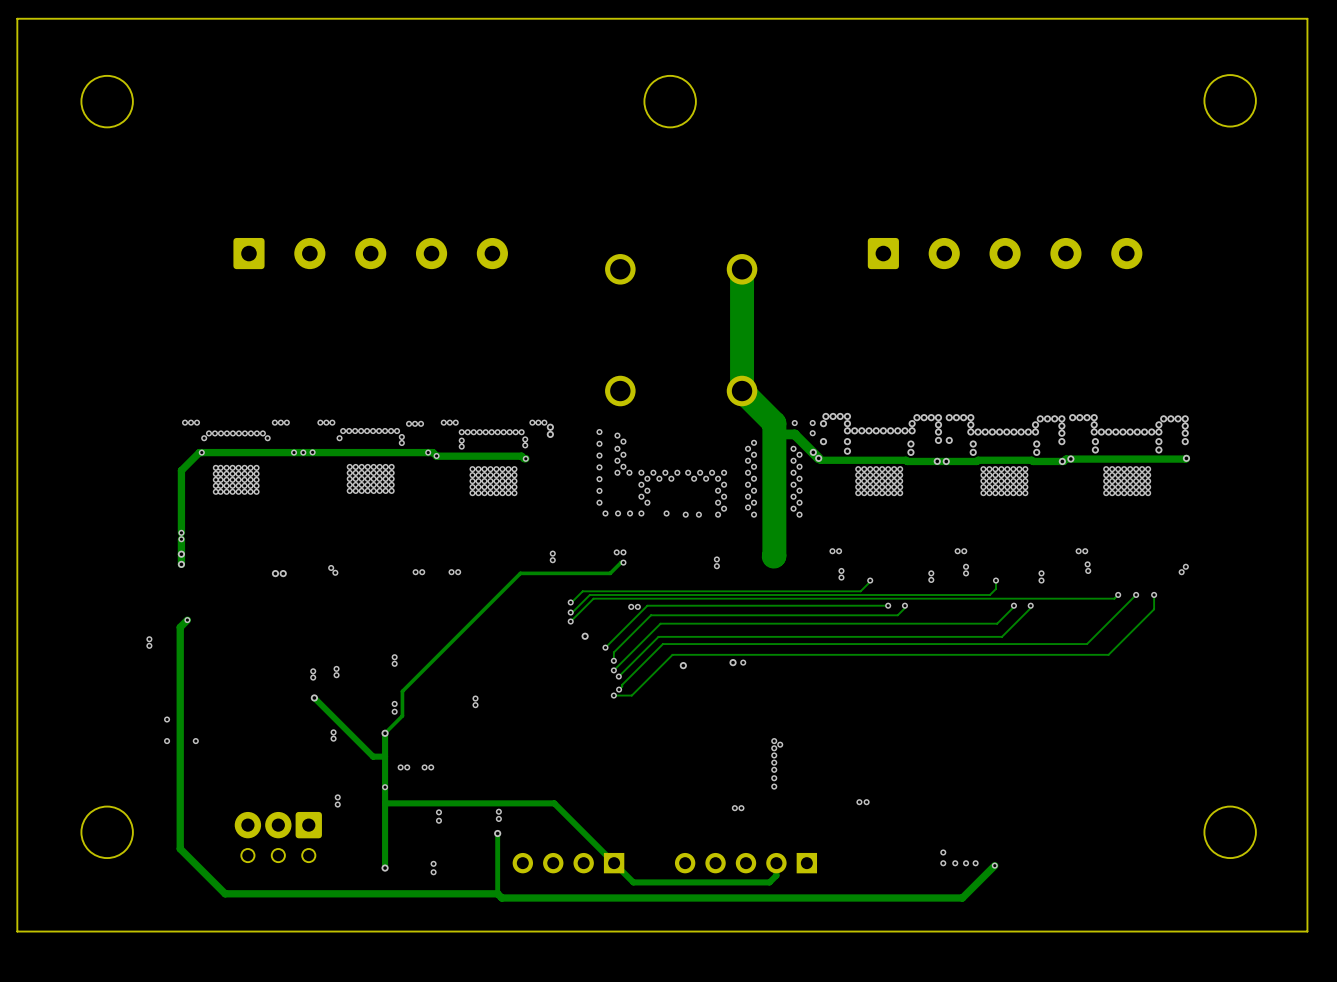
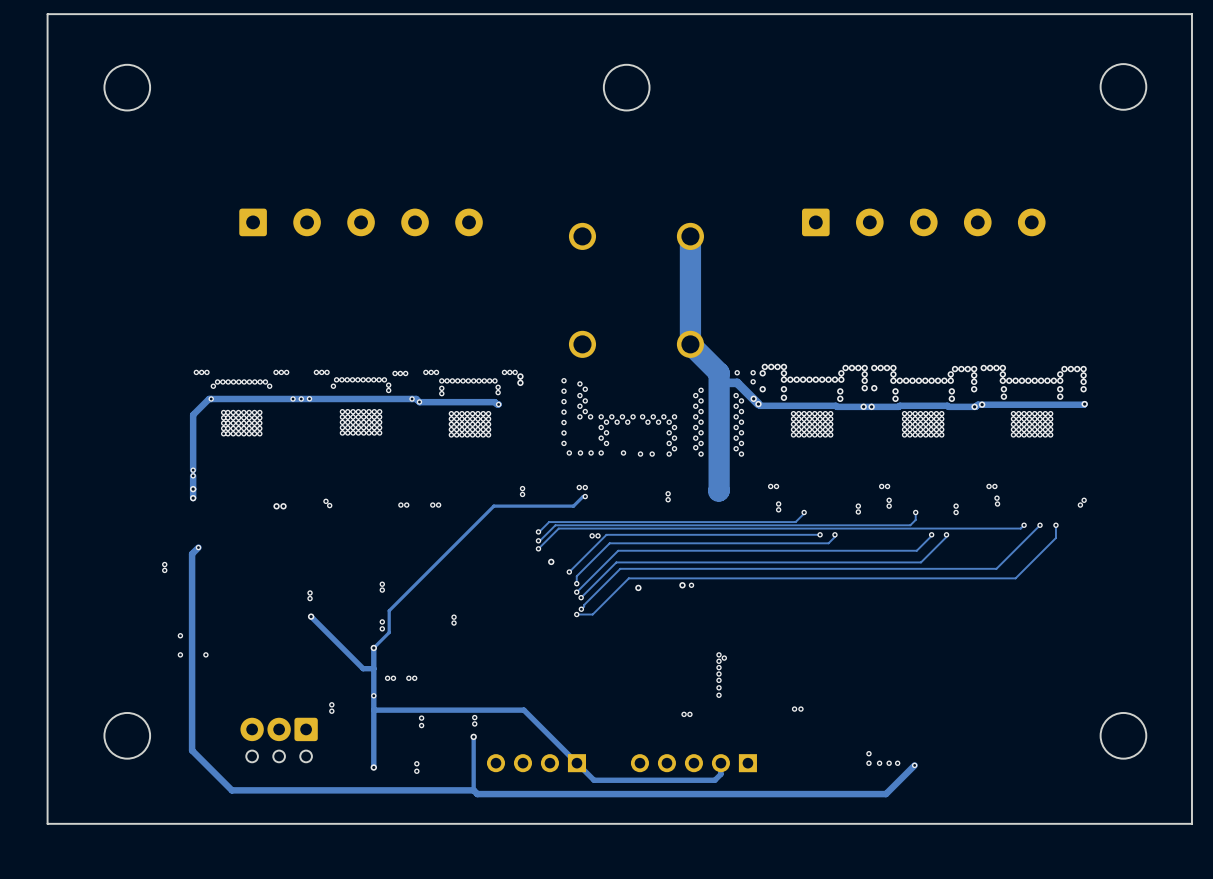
via: (394, 657) -> none
via: none -> (382, 584)
via: (394, 663) -> none
via: (336, 668) -> none
via: none -> (382, 590)
via: (336, 675) -> none
via: (333, 732) -> none
via: (333, 738) -> none

